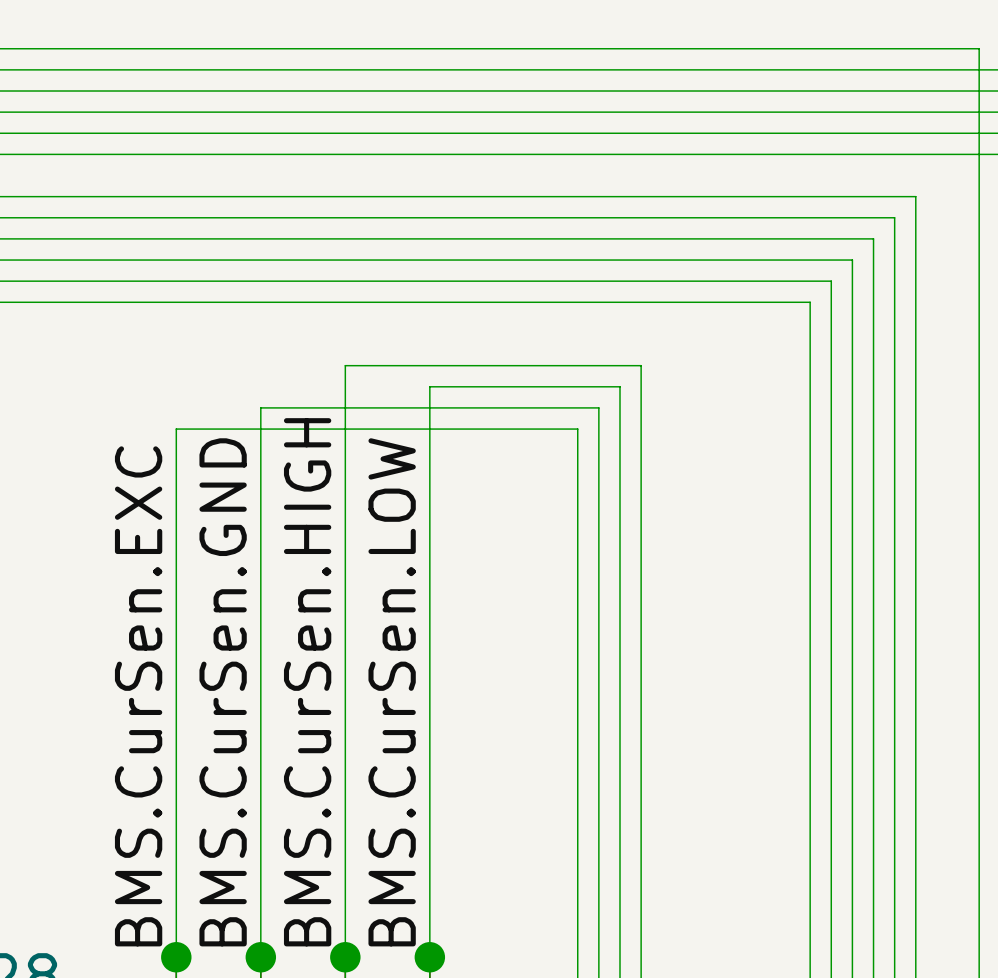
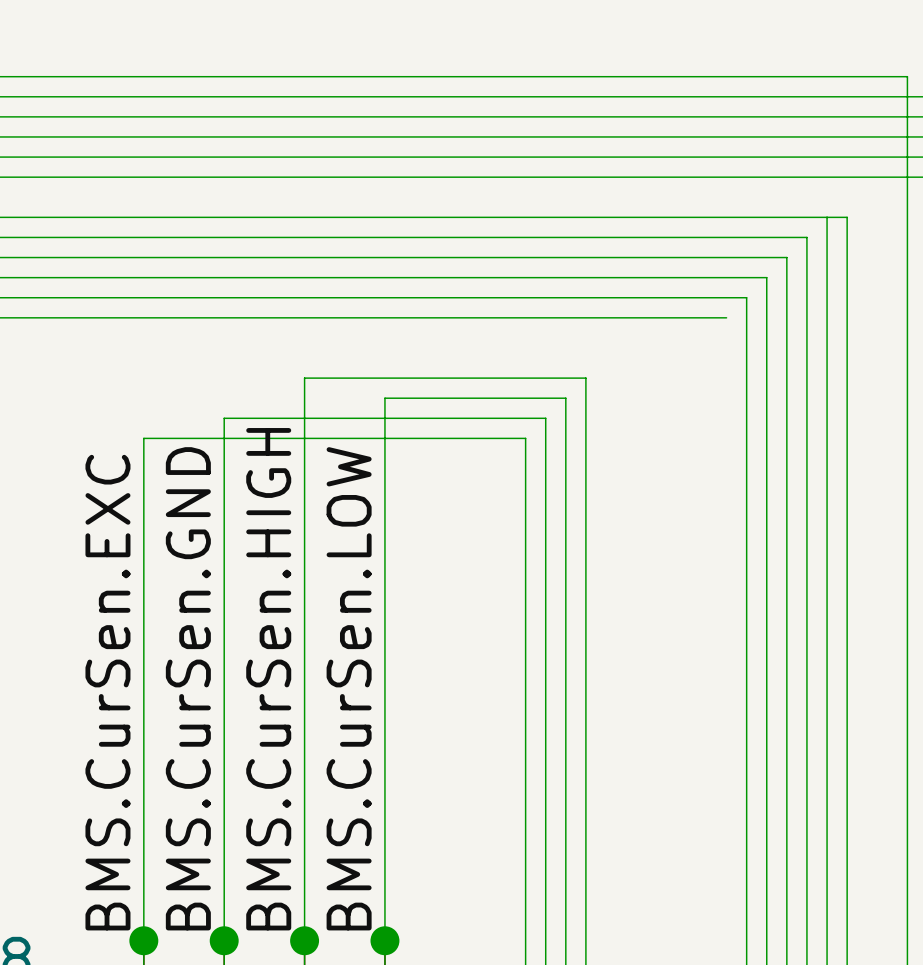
wire: (873, 217) (894, 217) -> (827, 217) (827, 237)
wire: (852, 238) (873, 238) -> (806, 237) (806, 257)
wire: none -> (786, 257) (786, 277)
wire: (831, 260) (852, 260) -> (766, 277) (766, 297)
wire: (810, 281) (831, 281) -> none
wire: (789, 302) (810, 302) -> (746, 297) (746, 317)

